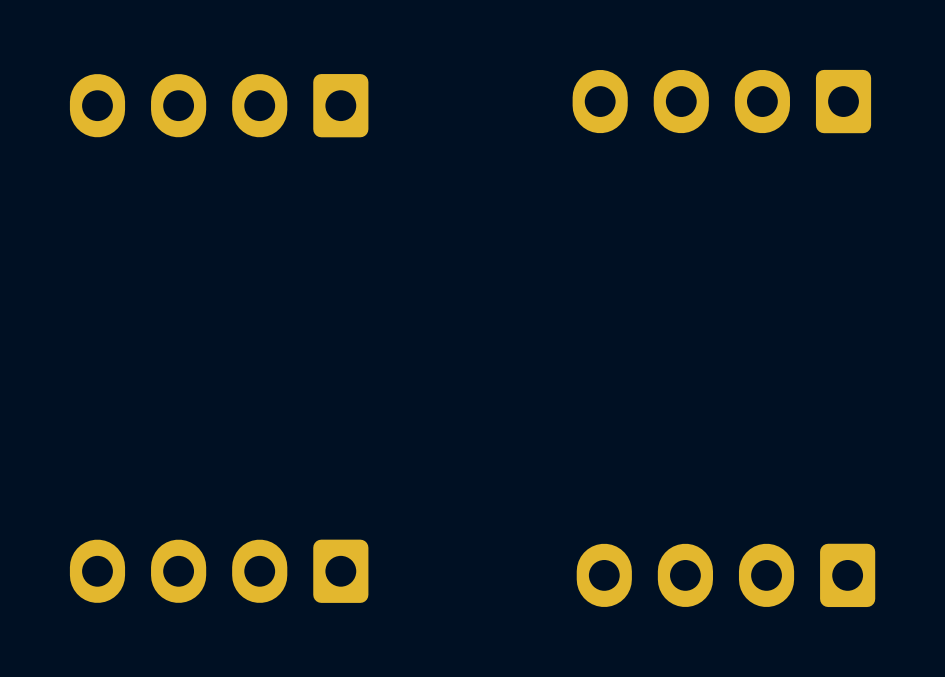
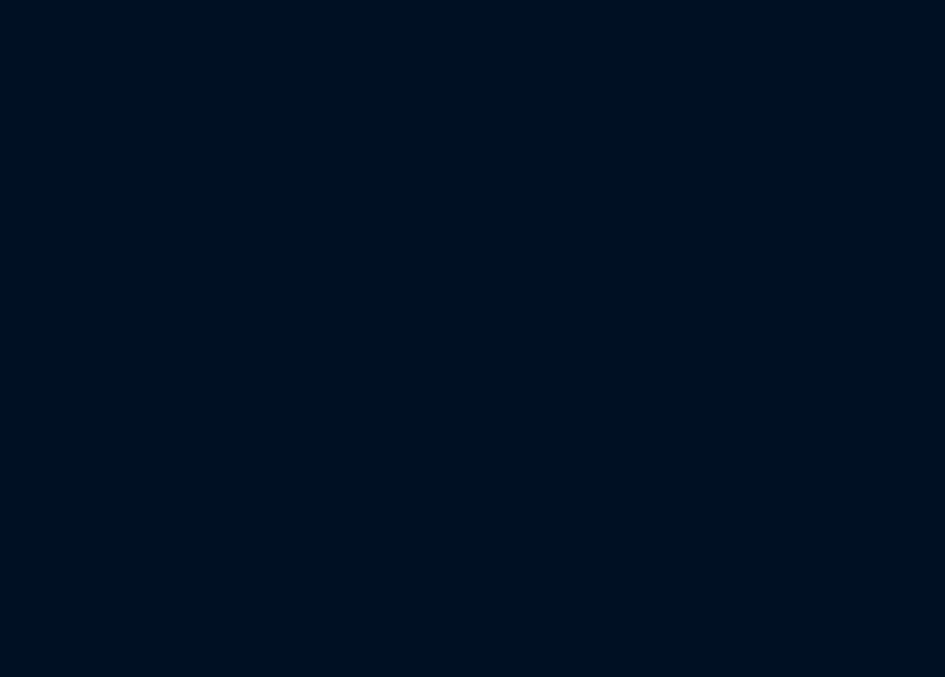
part: (721, 101) -> none
part: (219, 105) -> none
part: (219, 571) -> none
part: (725, 575) -> none

